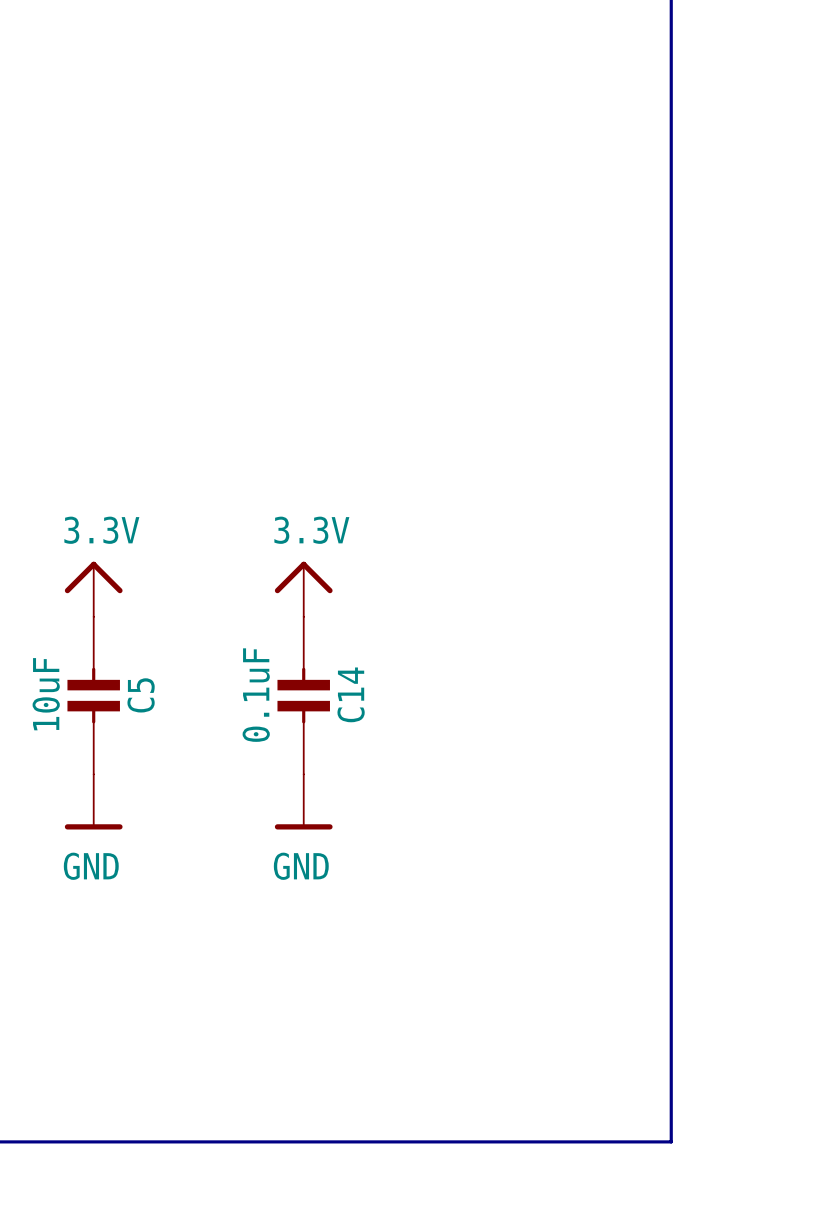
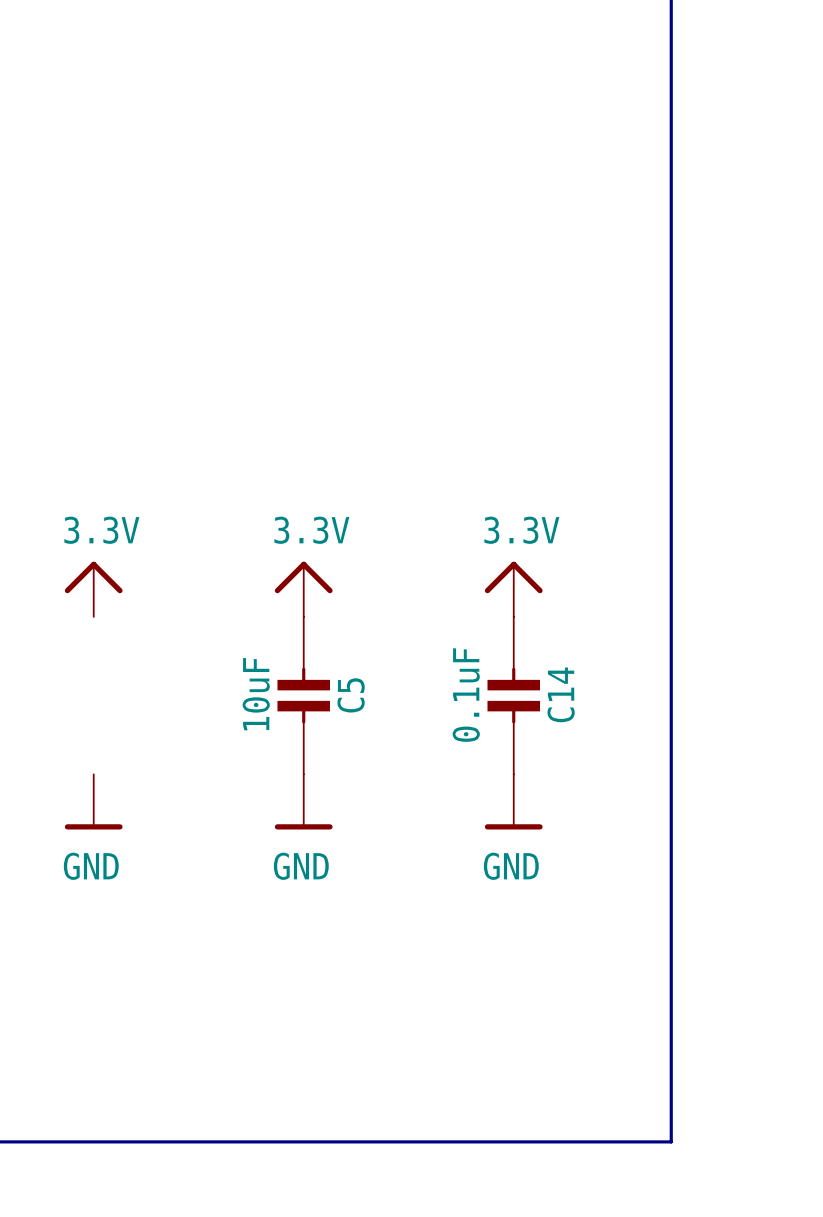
power symbol: none -> 3.3V (513, 589)
C14 name: C14 (351, 694) -> C5 (351, 695)
C5: 10uF (93, 695) -> none
C14 value: 0.1uF (256, 695) -> 10uF (256, 694)
C14: none -> 0.1uF (513, 695)
power symbol: none -> GND (513, 801)

